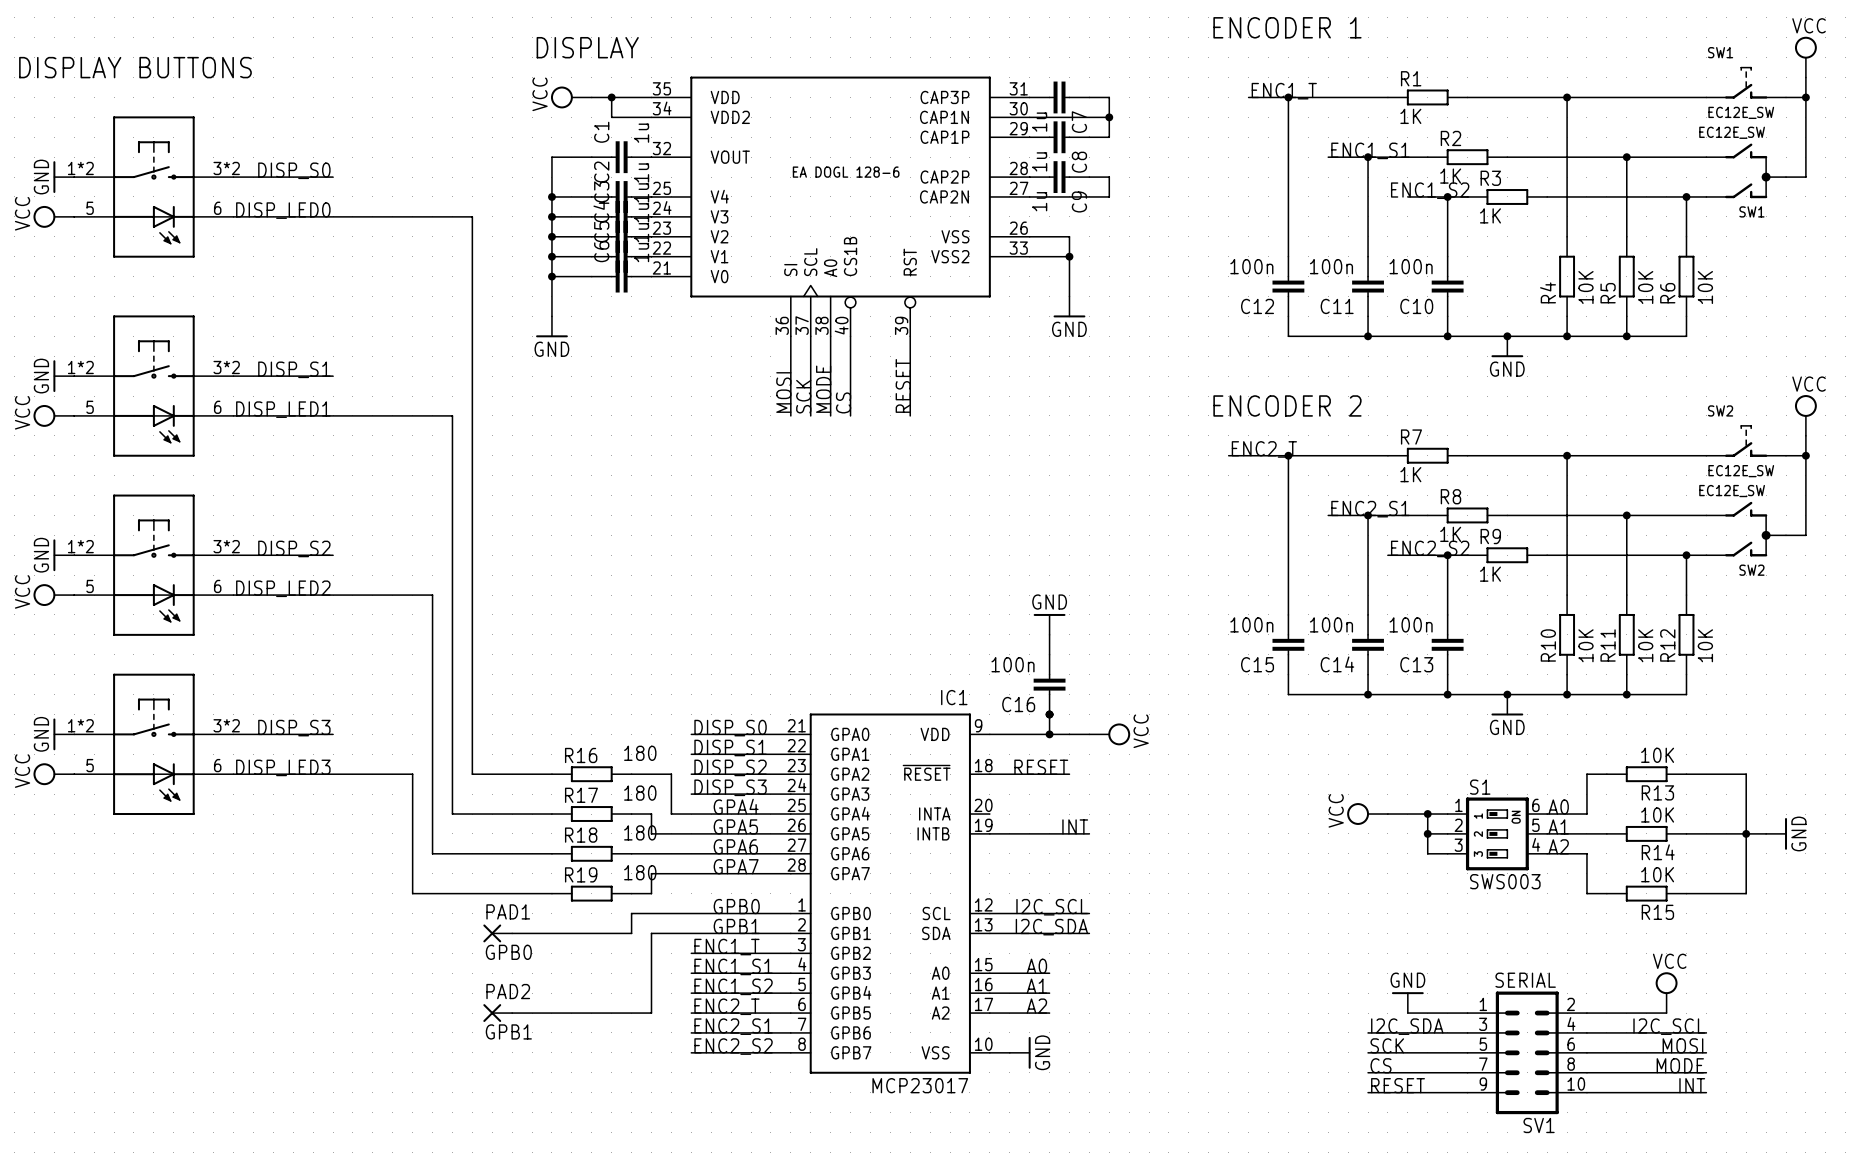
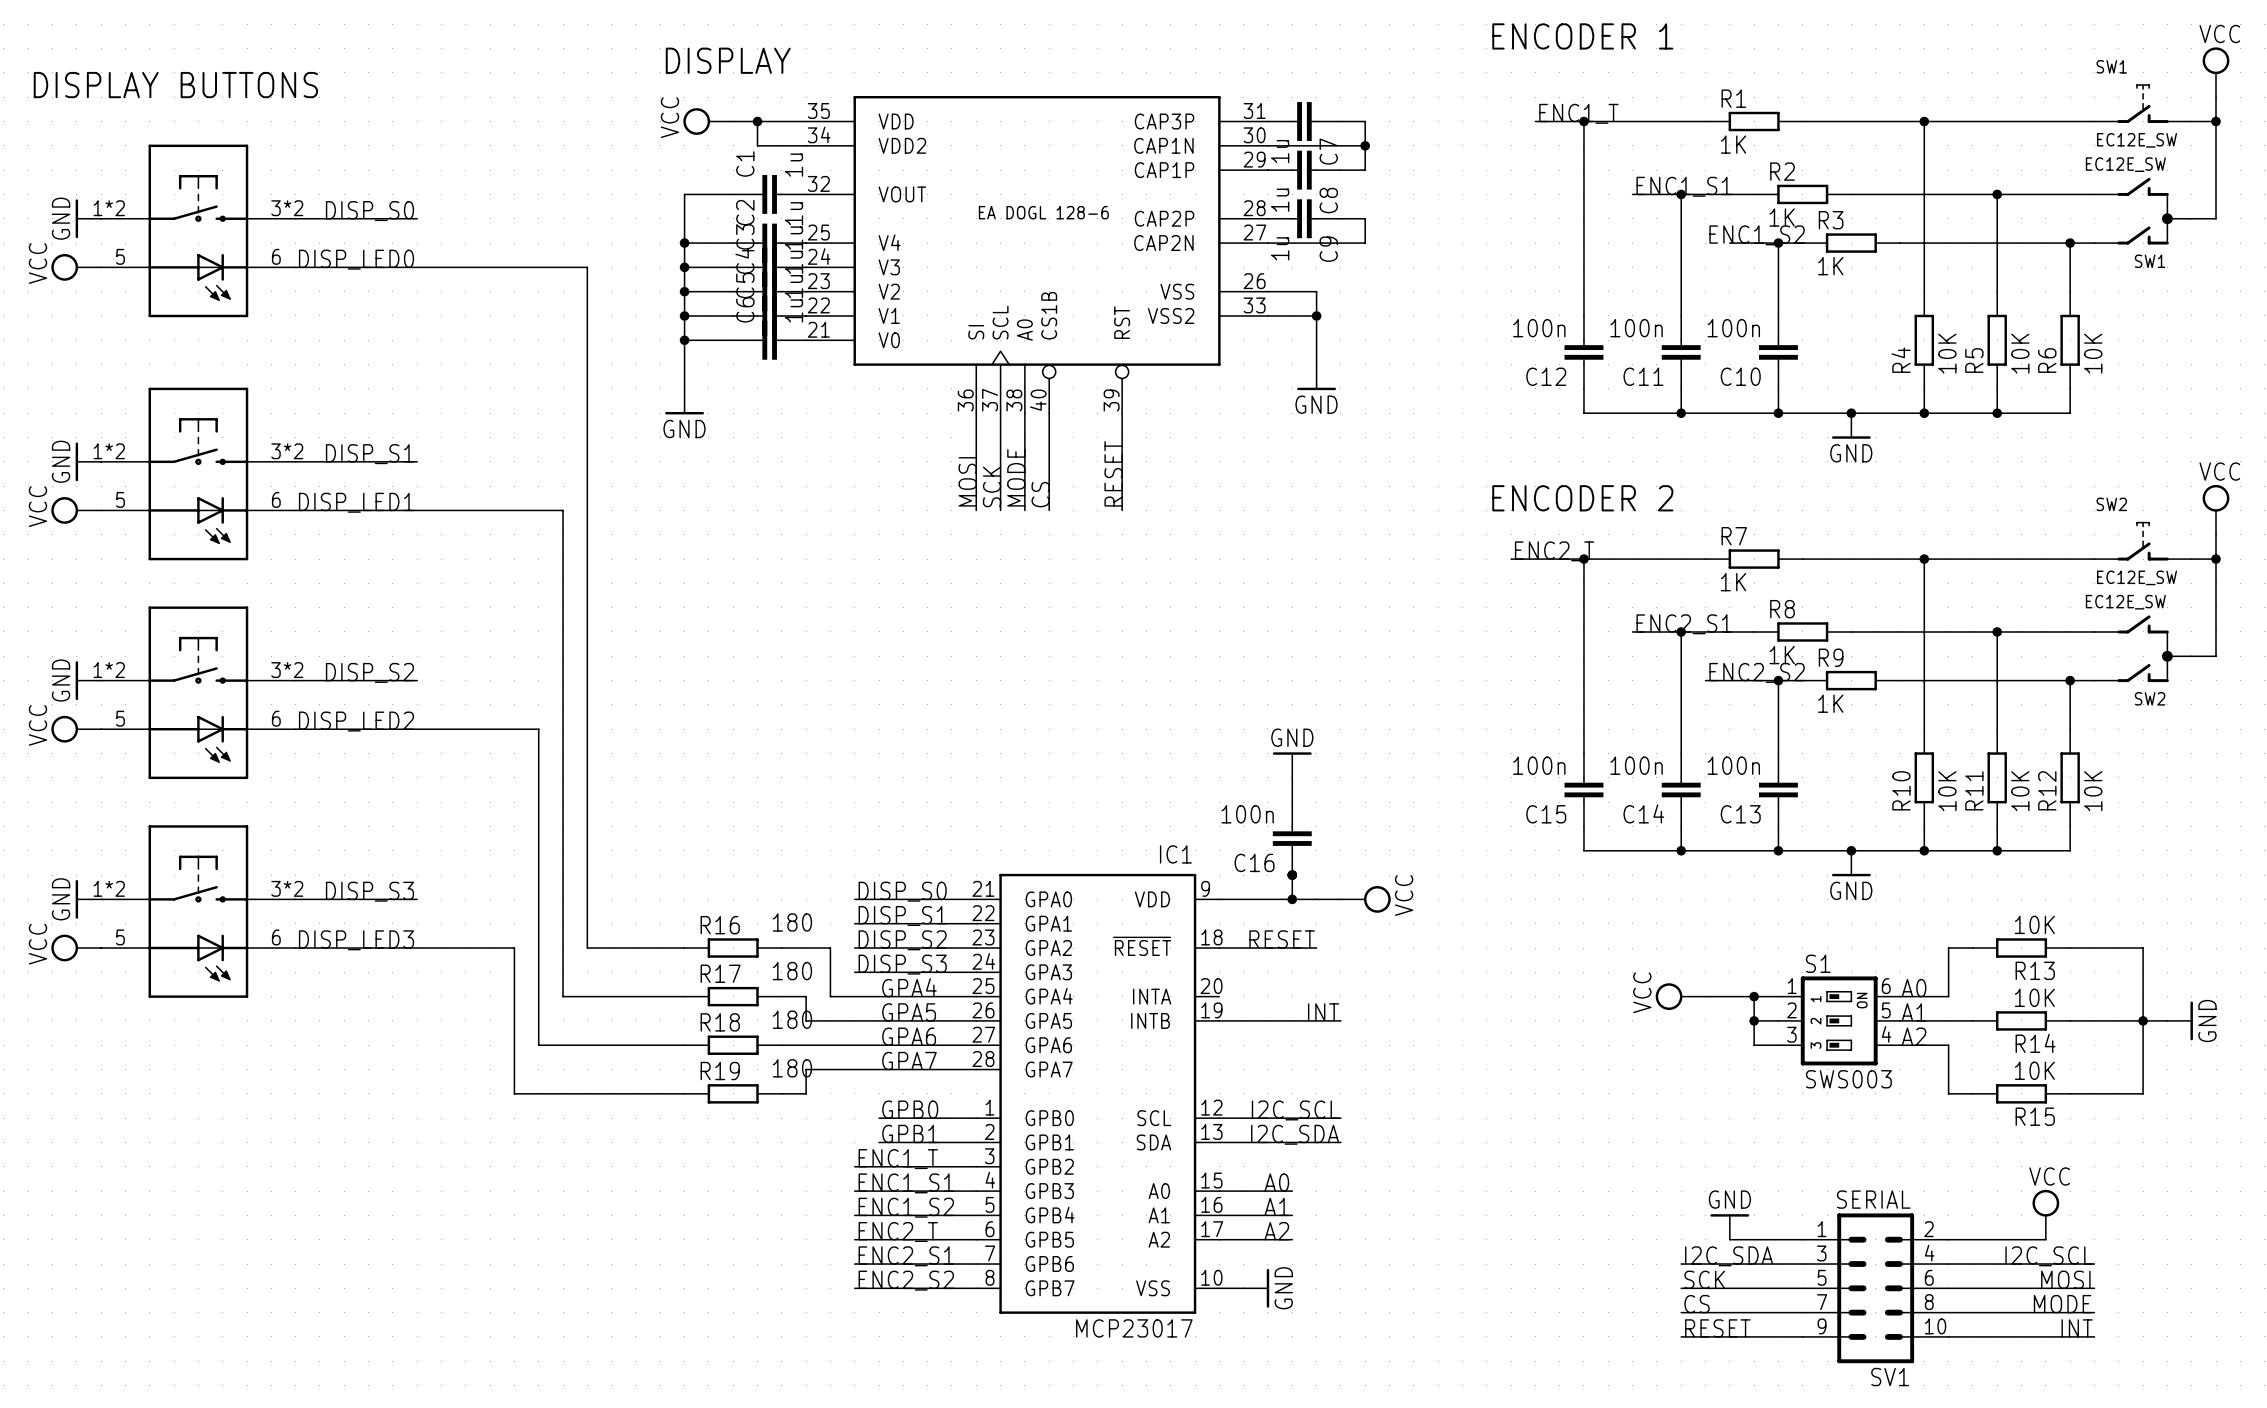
wire: (711, 913) (631, 913) (631, 933) (512, 933) -> none
PAD1: GPB0 (497, 933) -> none
wire: (711, 933) (651, 933) (651, 1013) (512, 1013) -> none
PAD2: GPB1 (497, 1013) -> none

